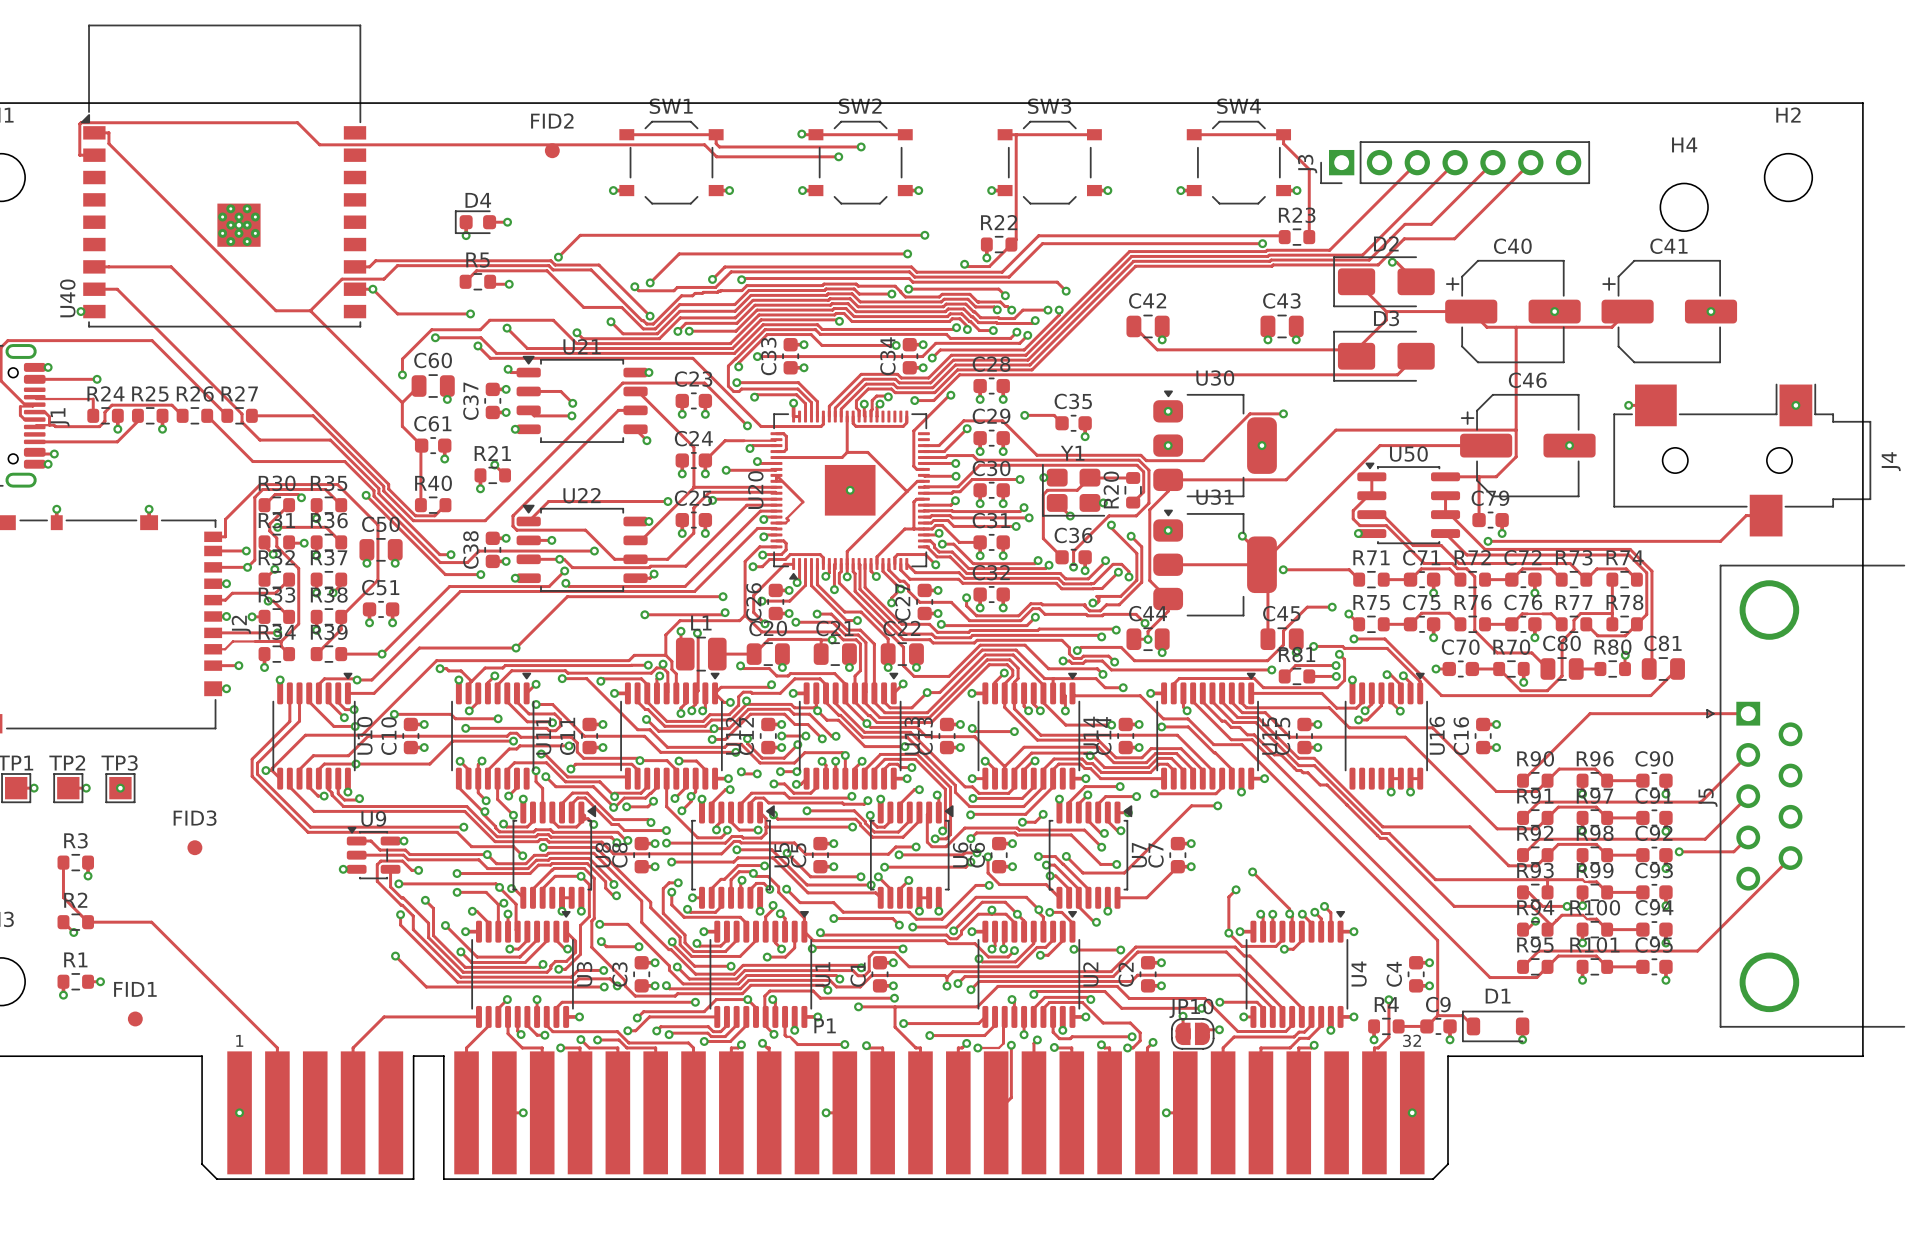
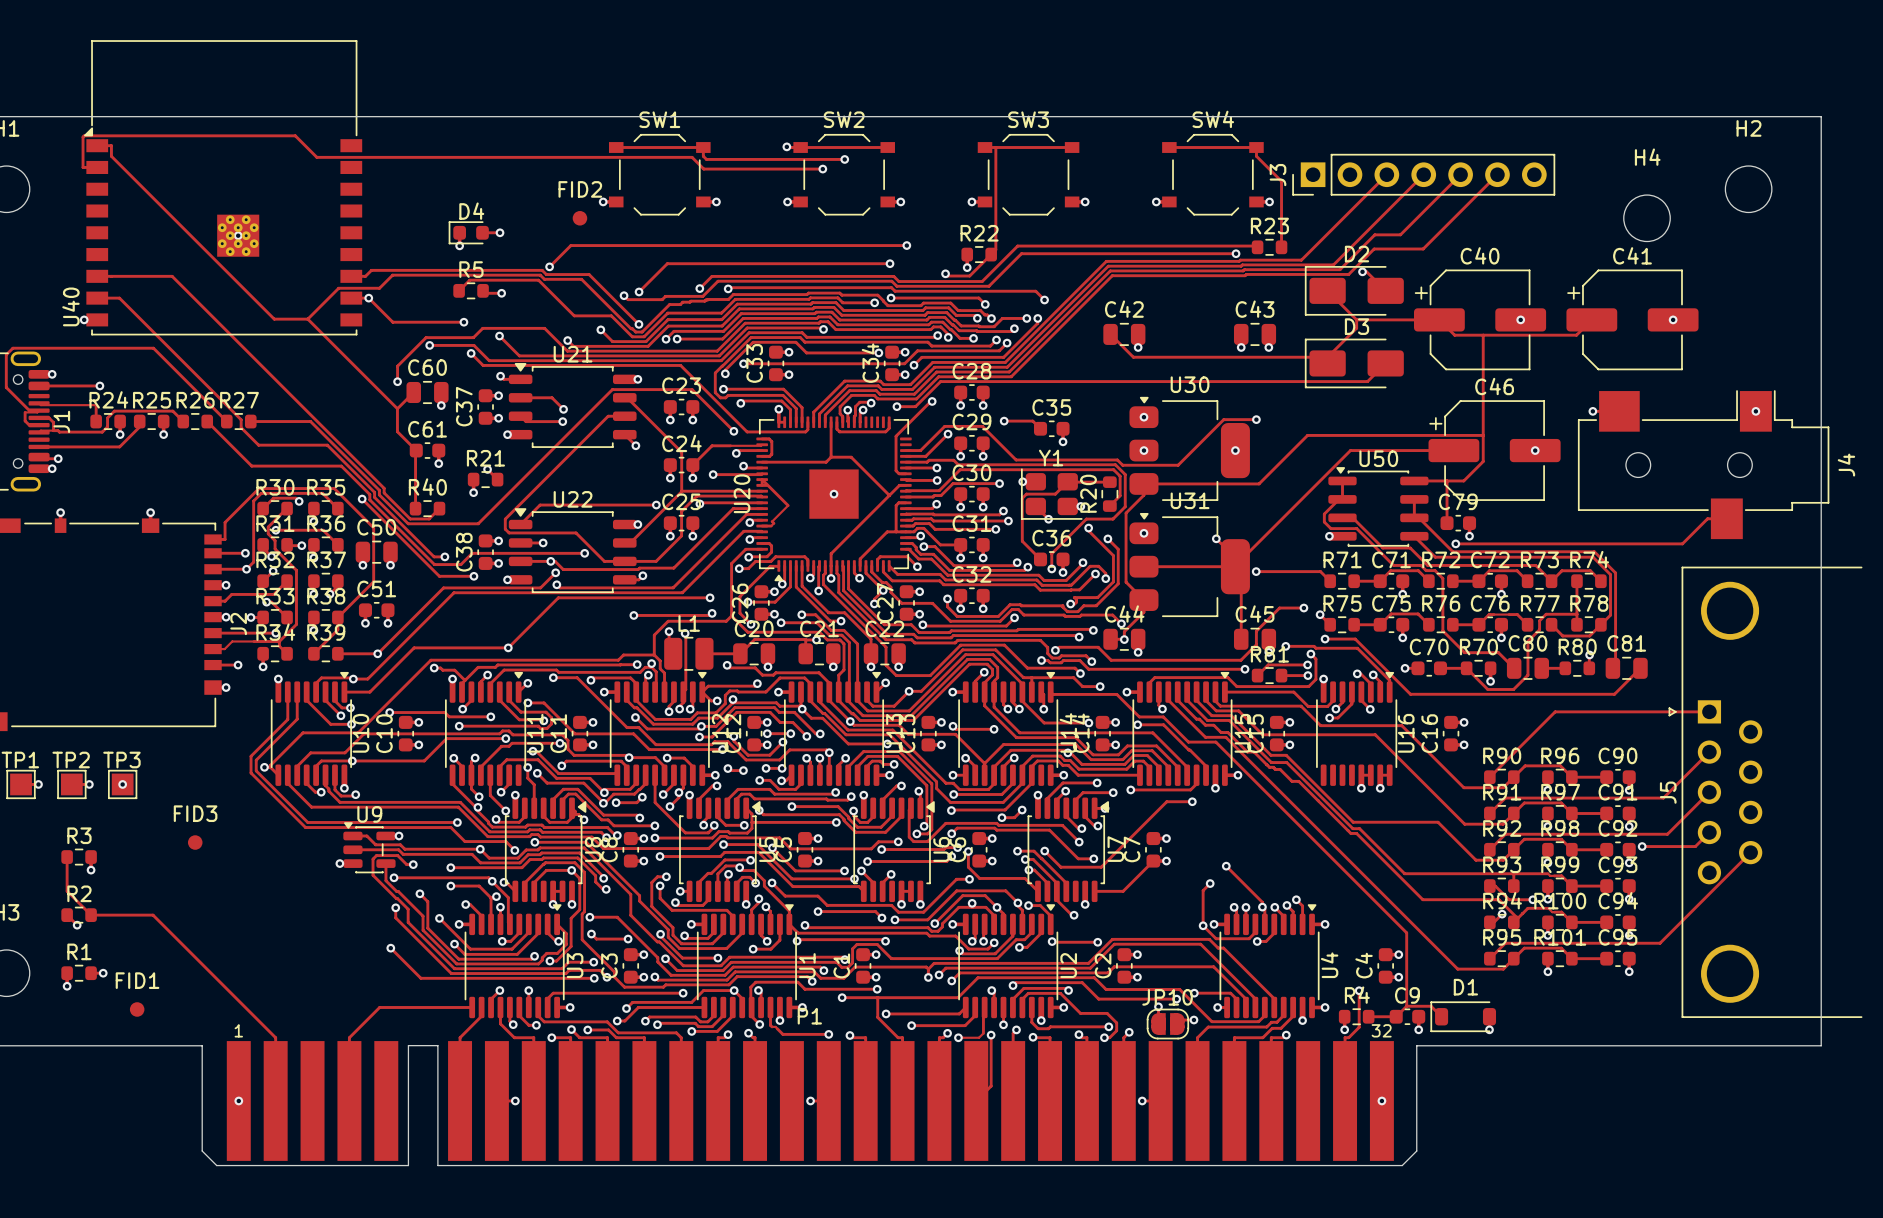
FID2 position: (552, 150) -> (579, 218)

